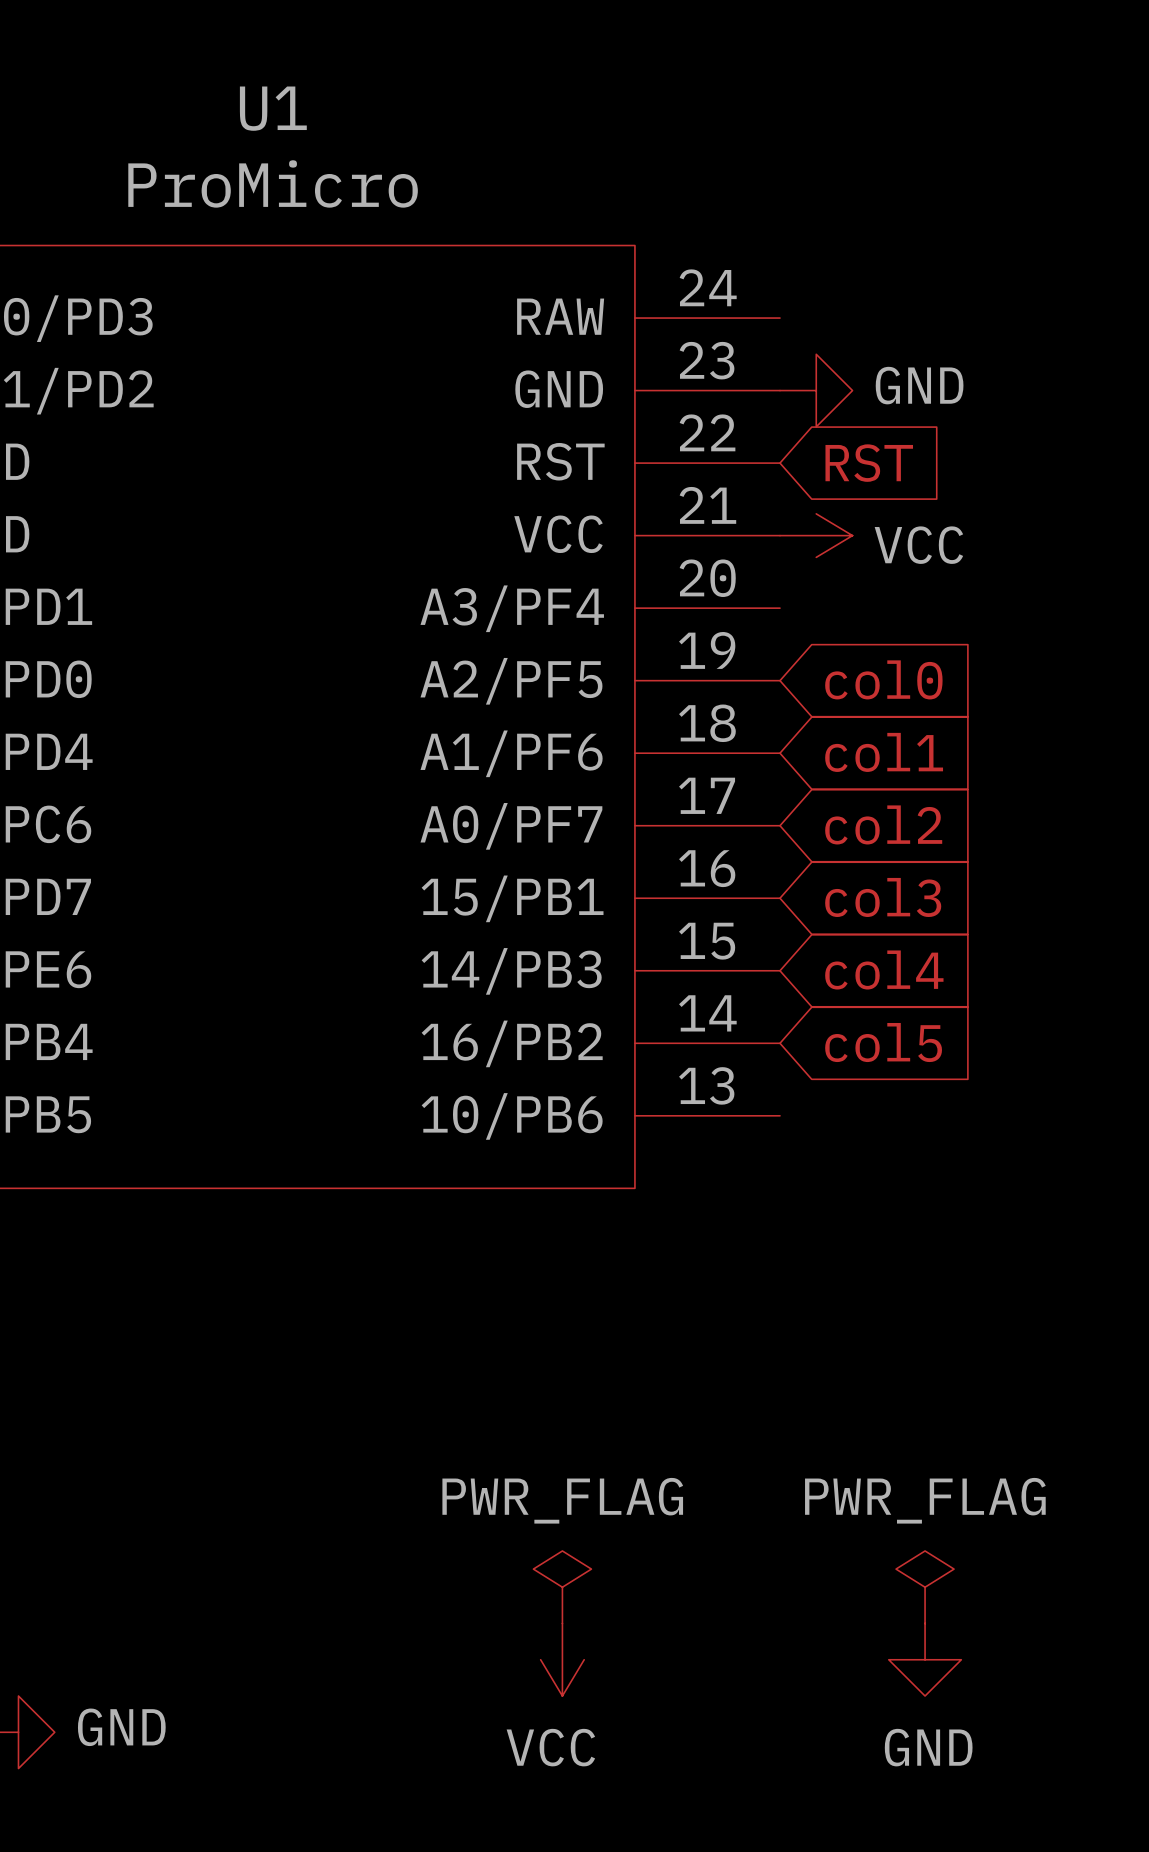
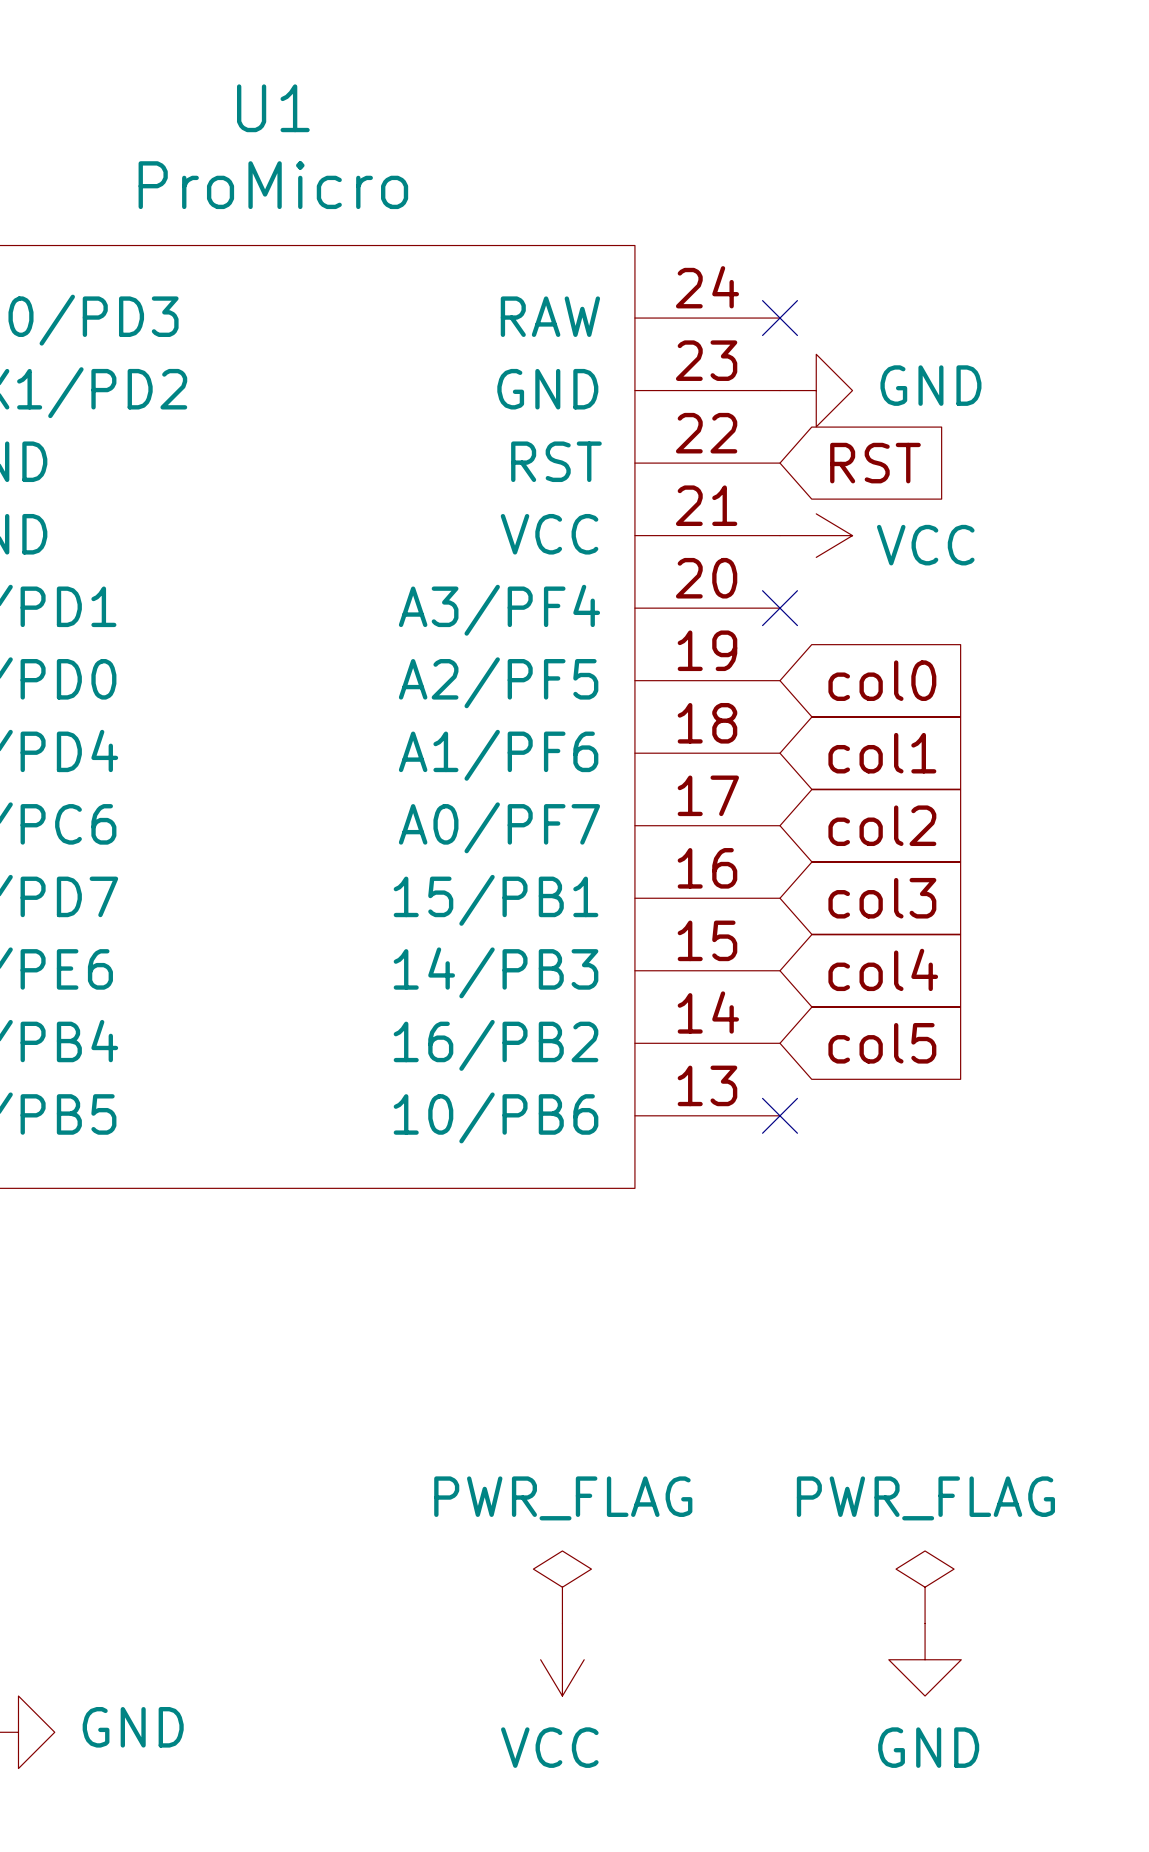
no-connect mark: none -> (780, 318)
no-connect mark: none -> (780, 608)
no-connect mark: none -> (780, 1115)

